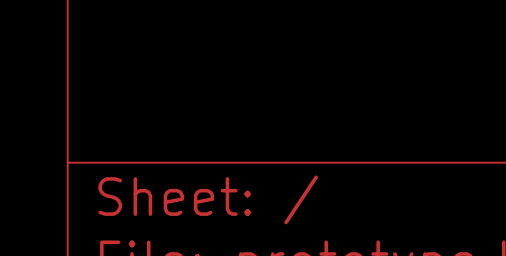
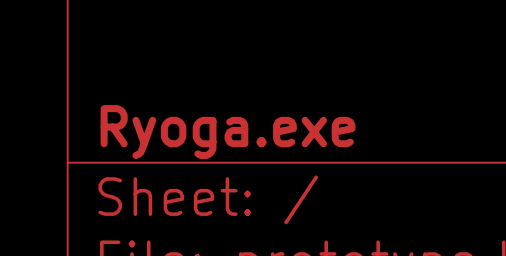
title block: none -> Ryoga.exe (228, 132)

